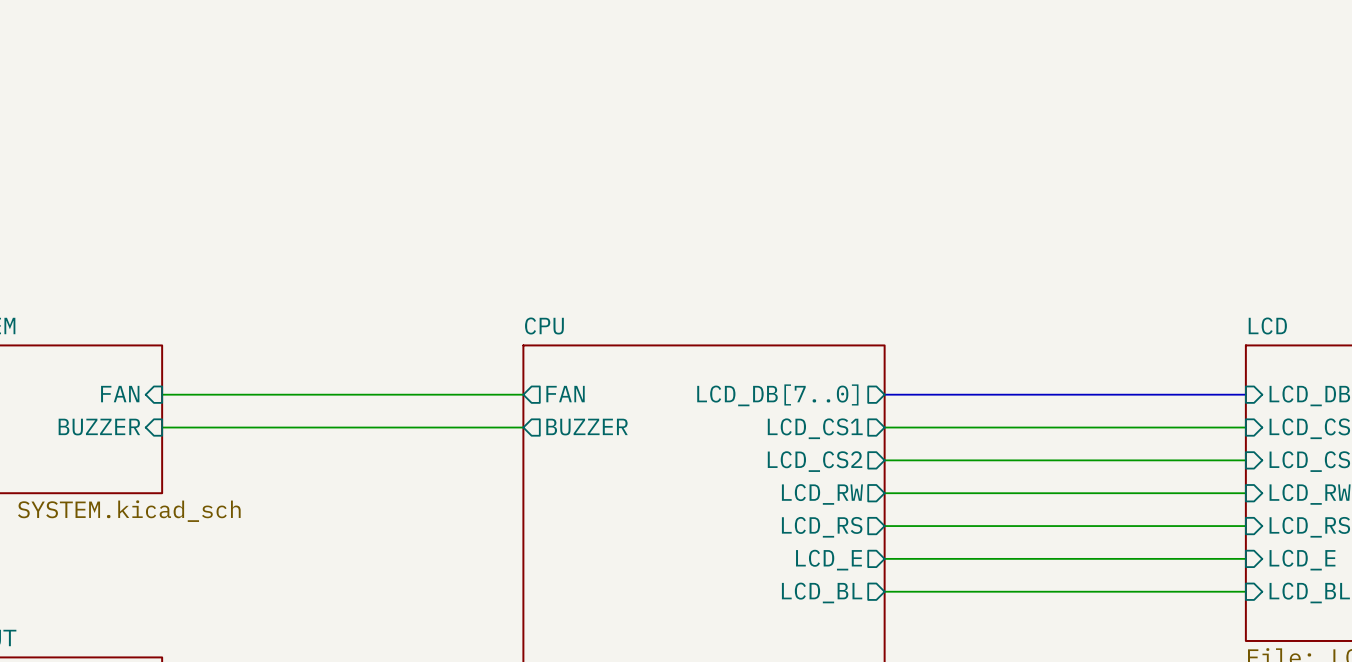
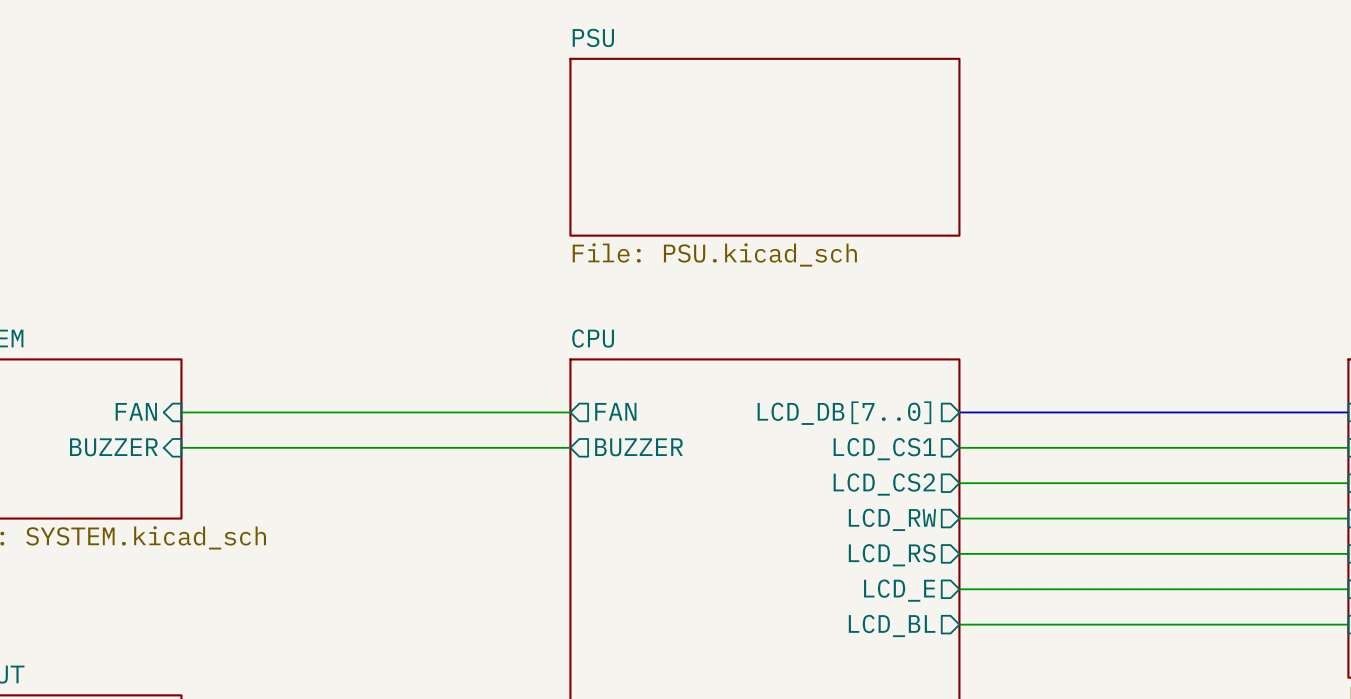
sheet PSU: none -> File: PSU.kicad_sch (764, 147)

